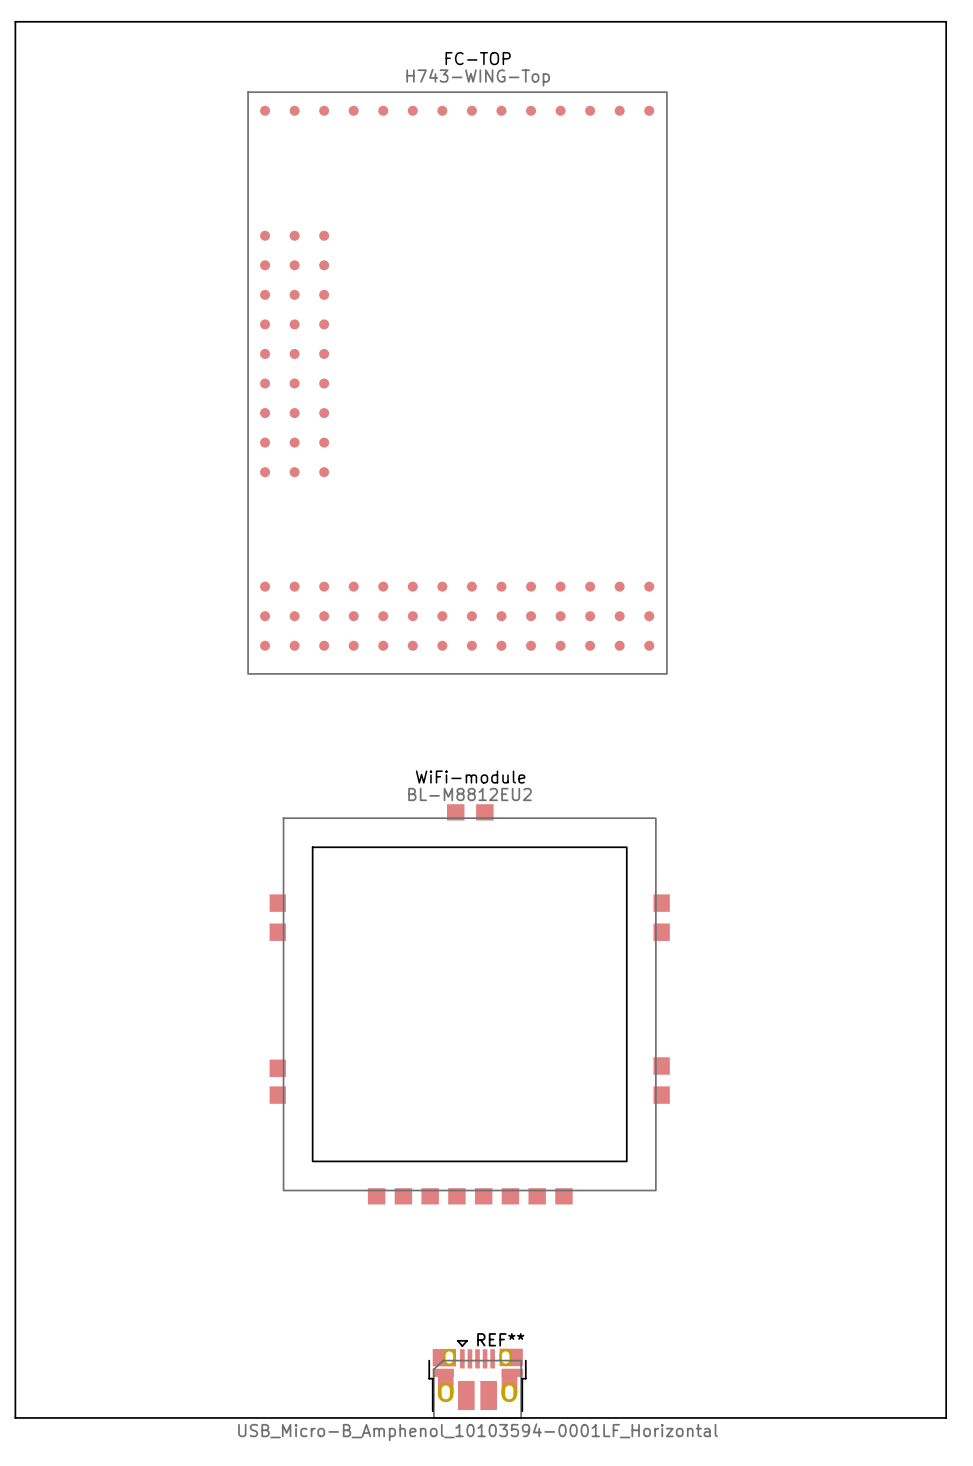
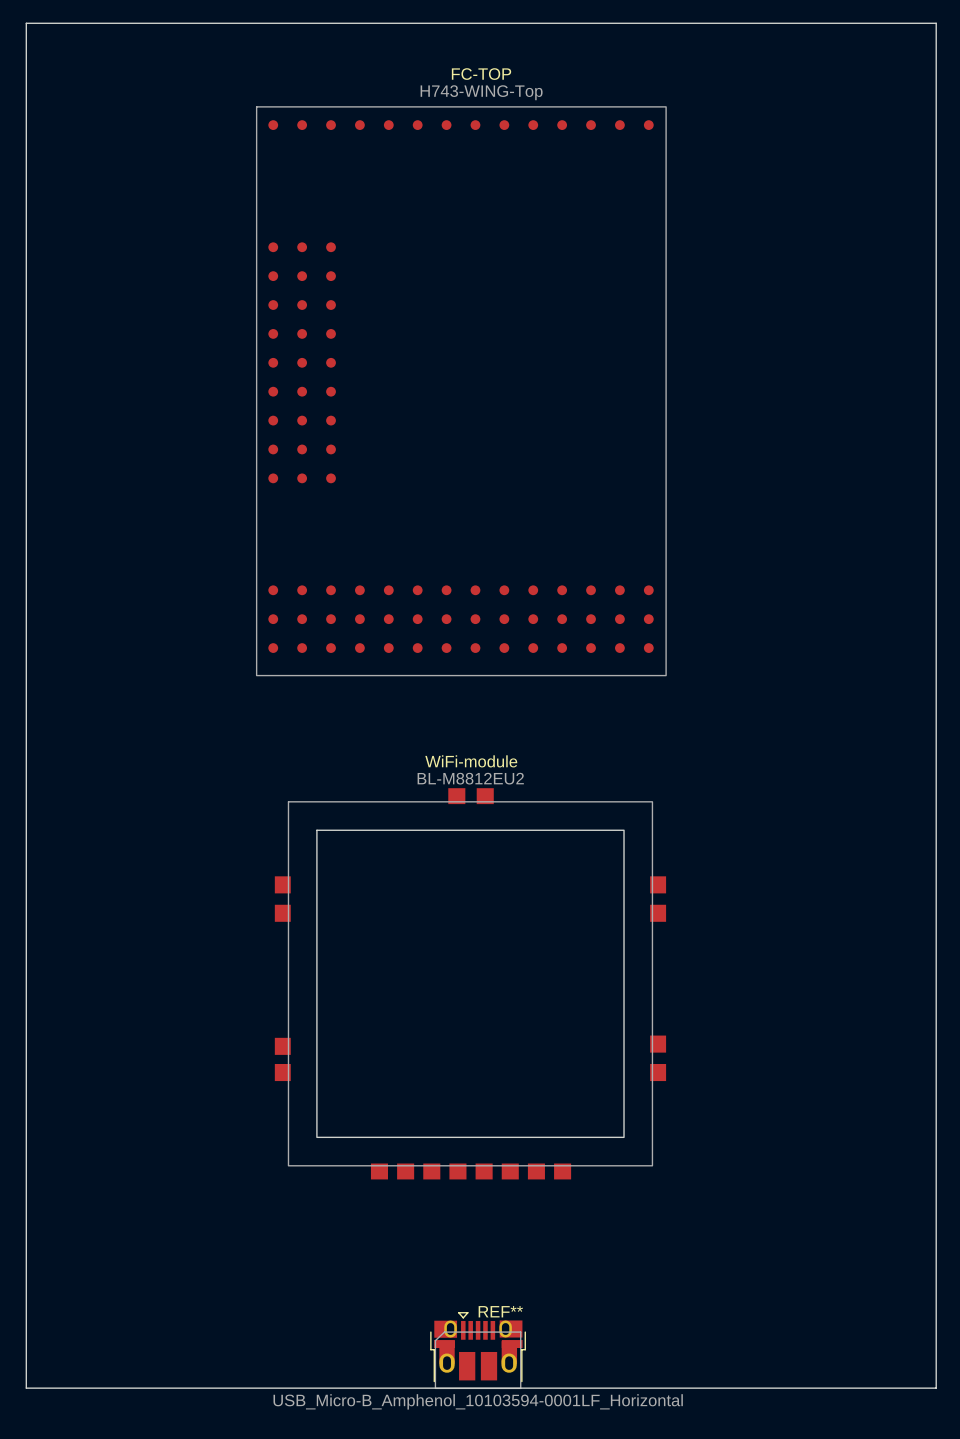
FC-TOP position: (457, 383) -> (461, 391)

